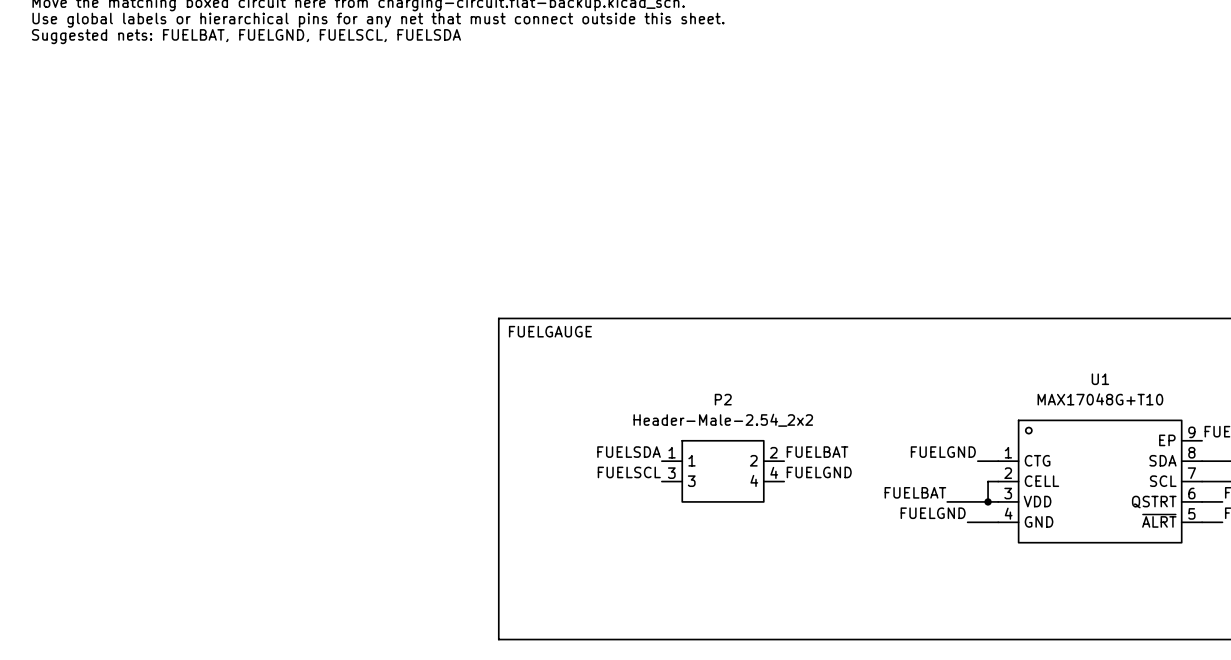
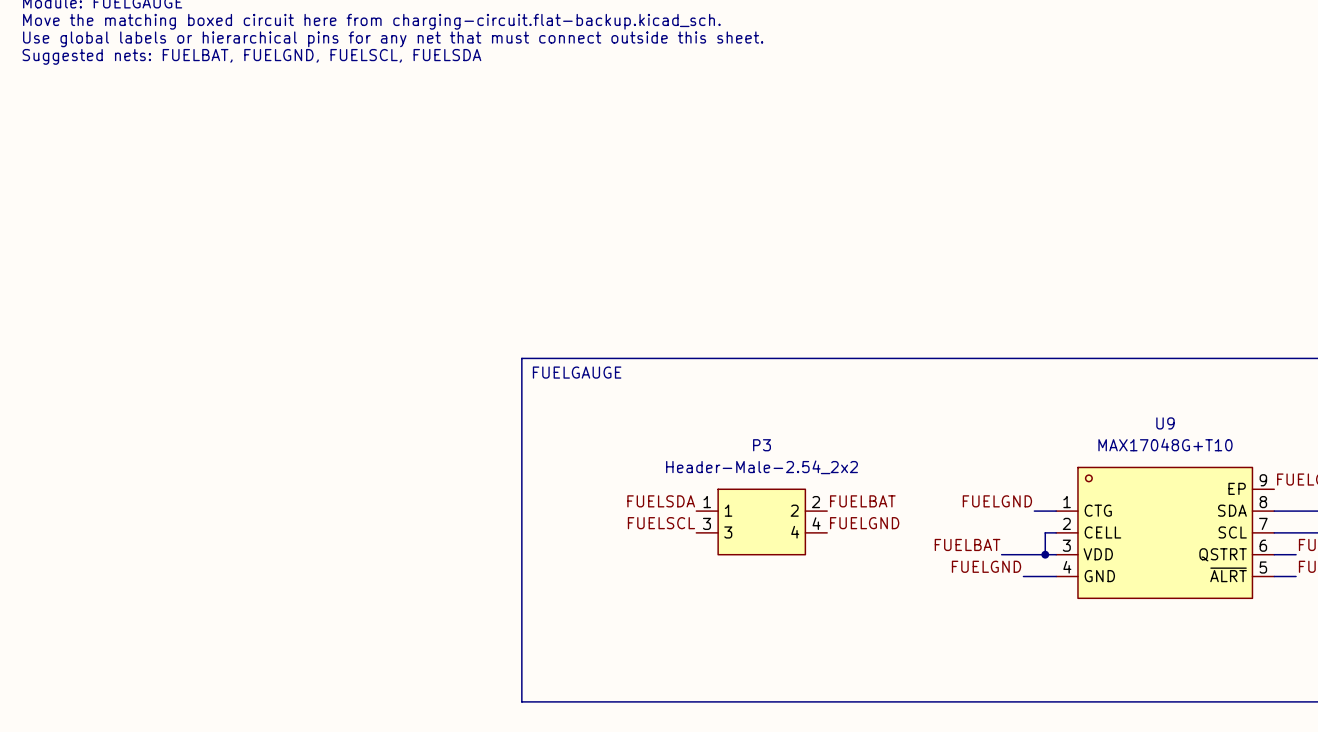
U1 name: U1 (1100, 379) -> U9 (1165, 423)
P2 name: P2 (723, 399) -> P3 (762, 445)

